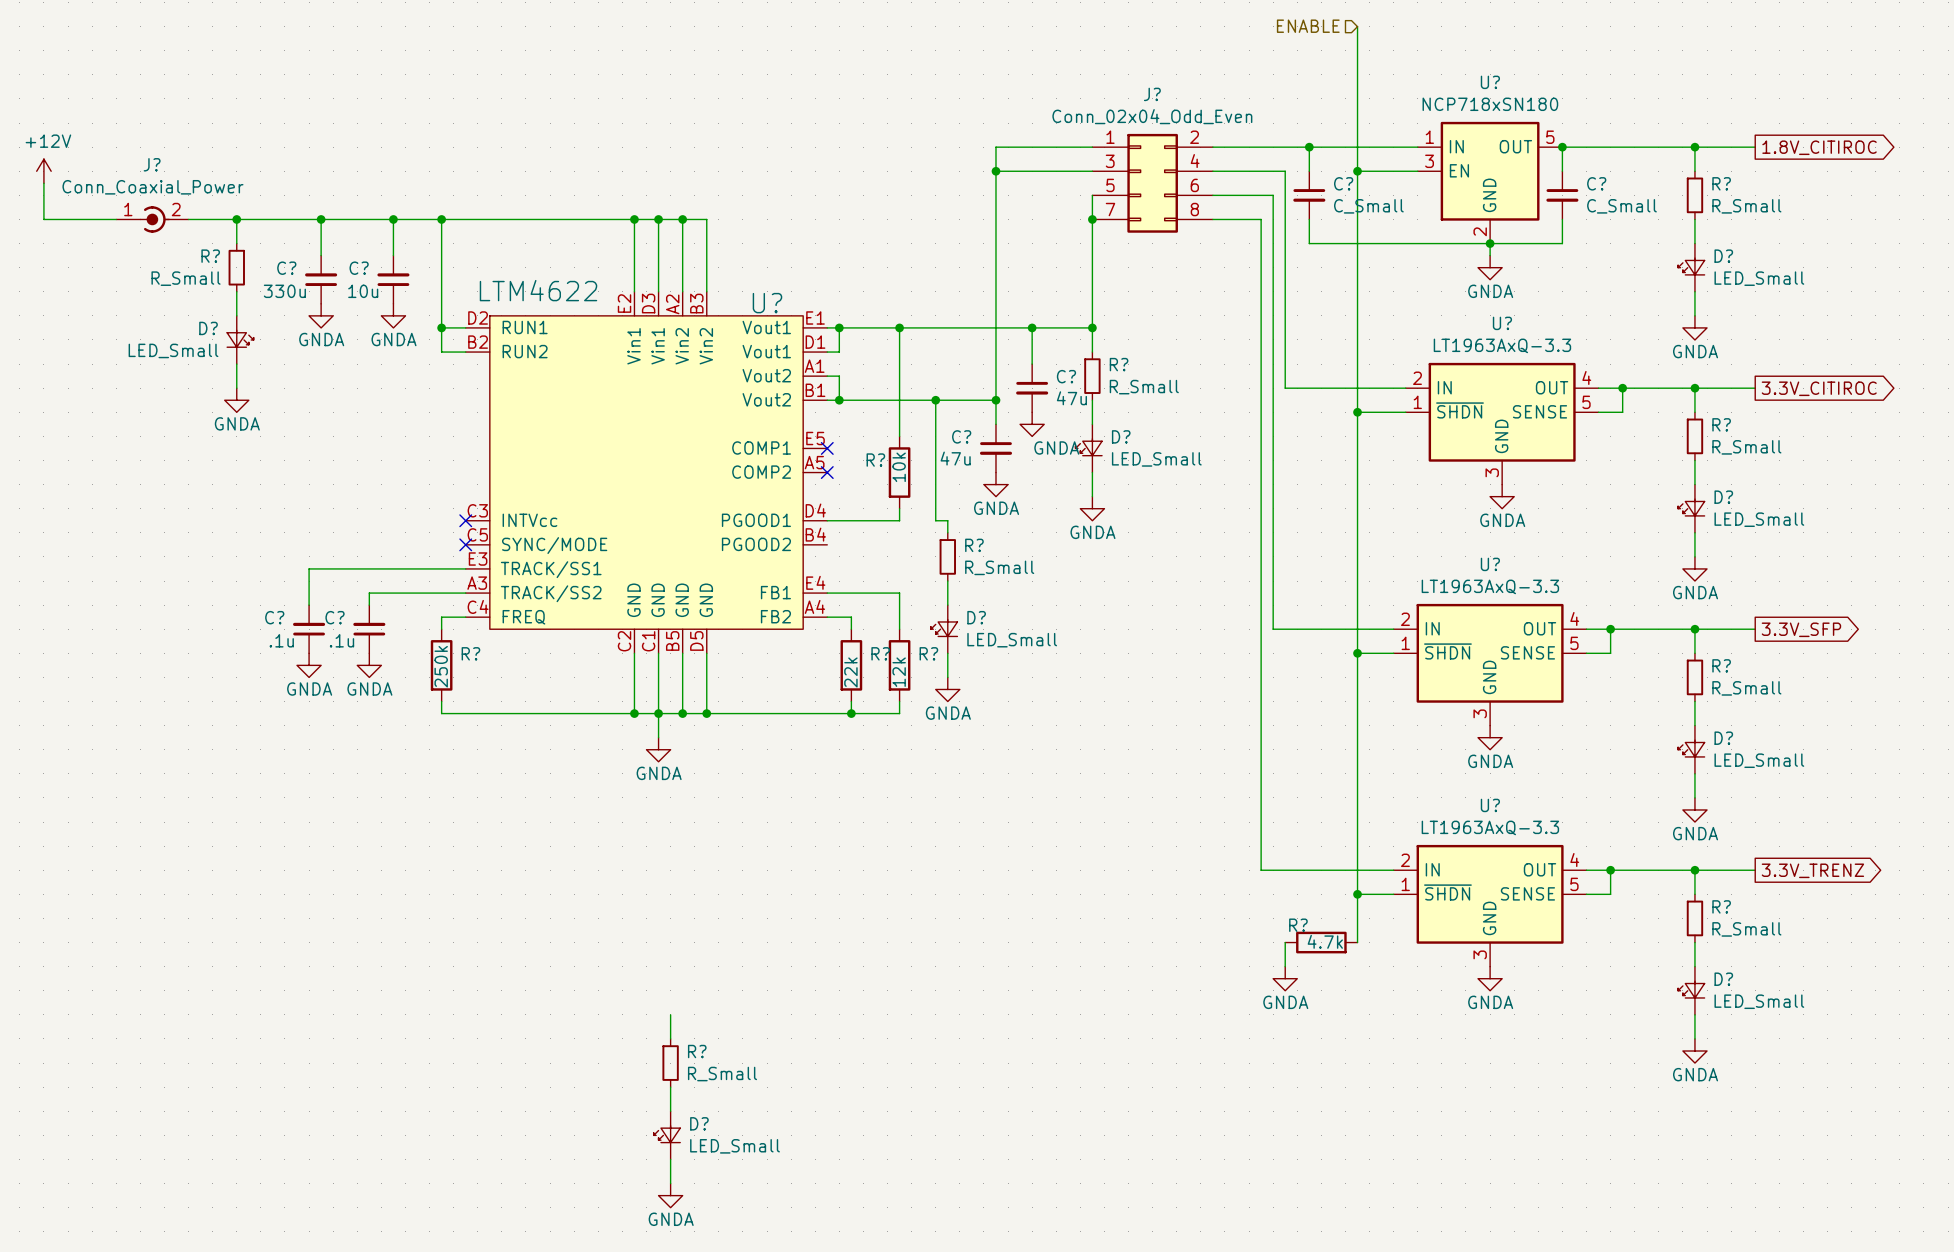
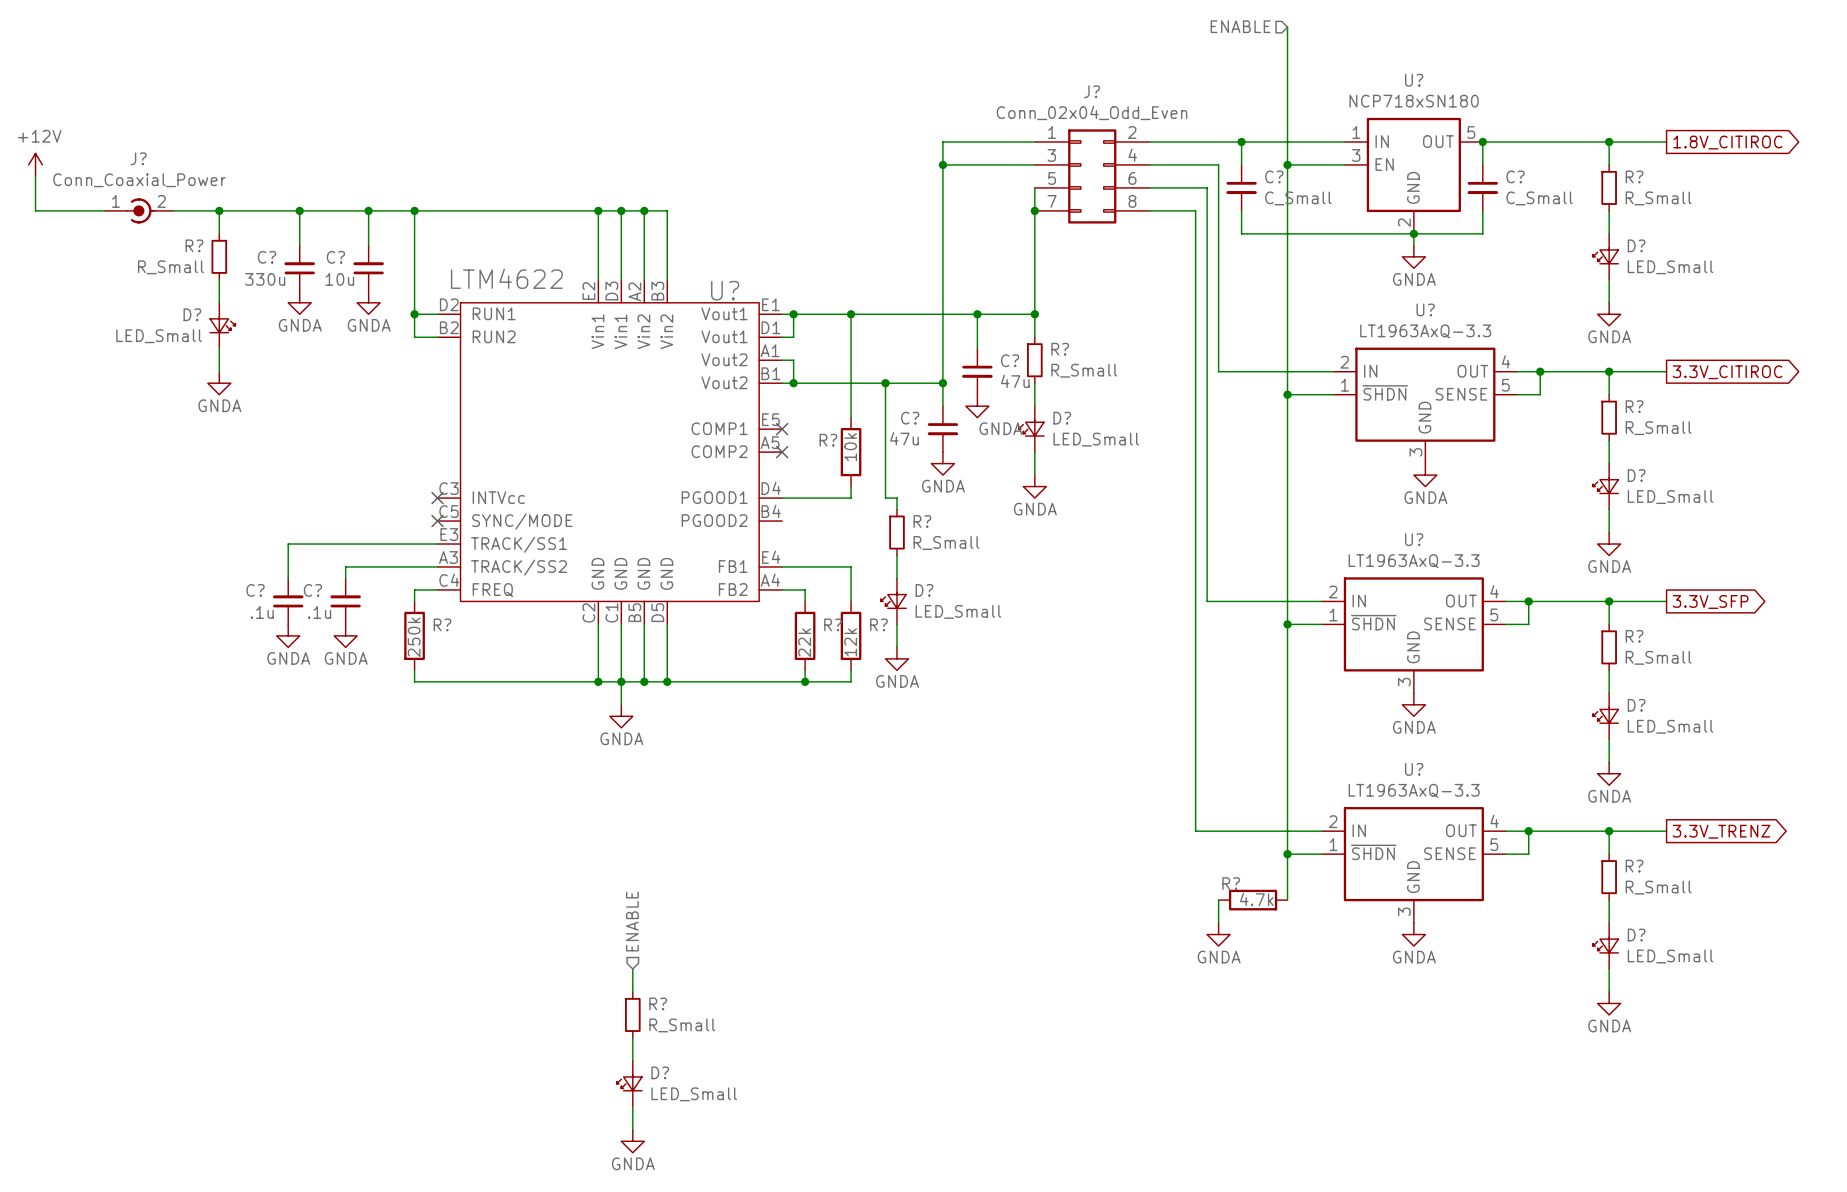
hierarchical label: none -> ENABLE (632, 921)

